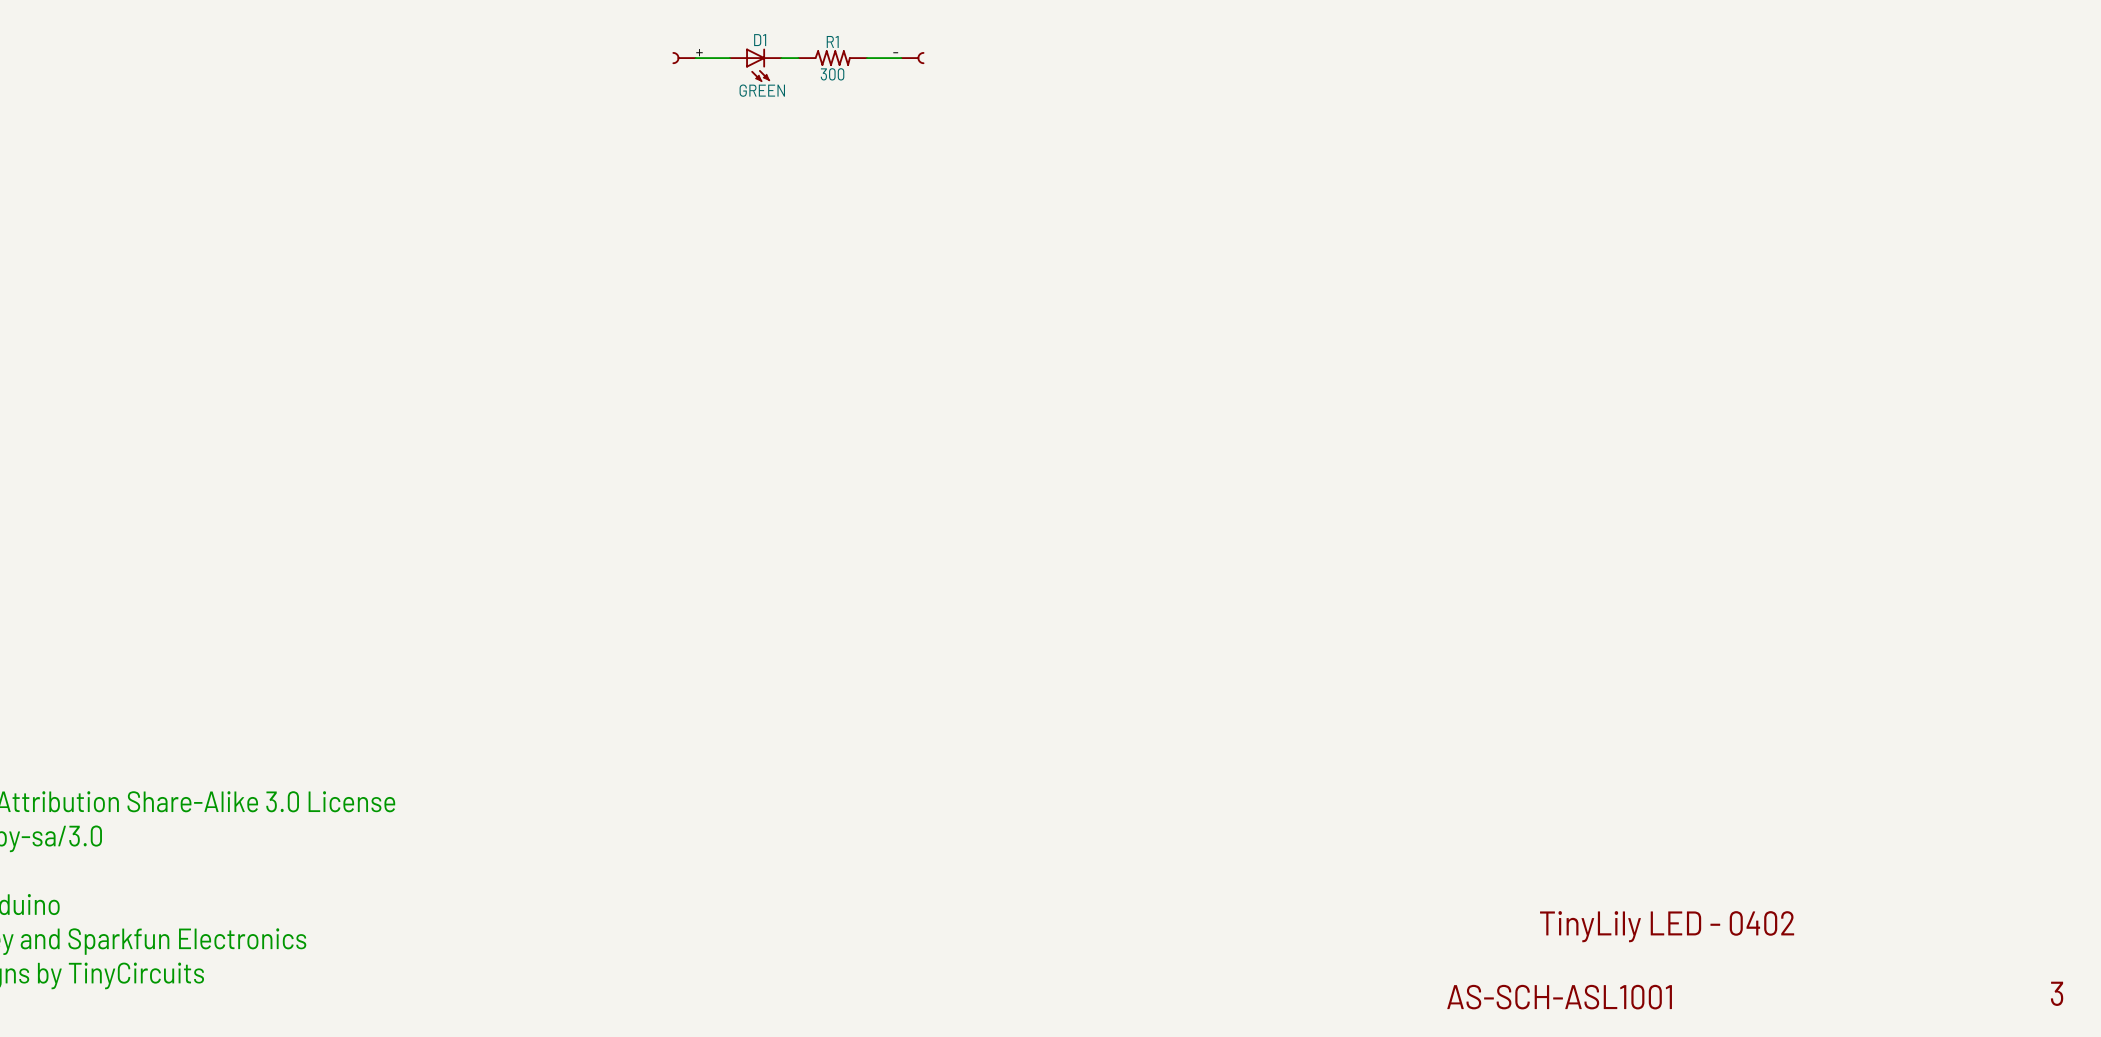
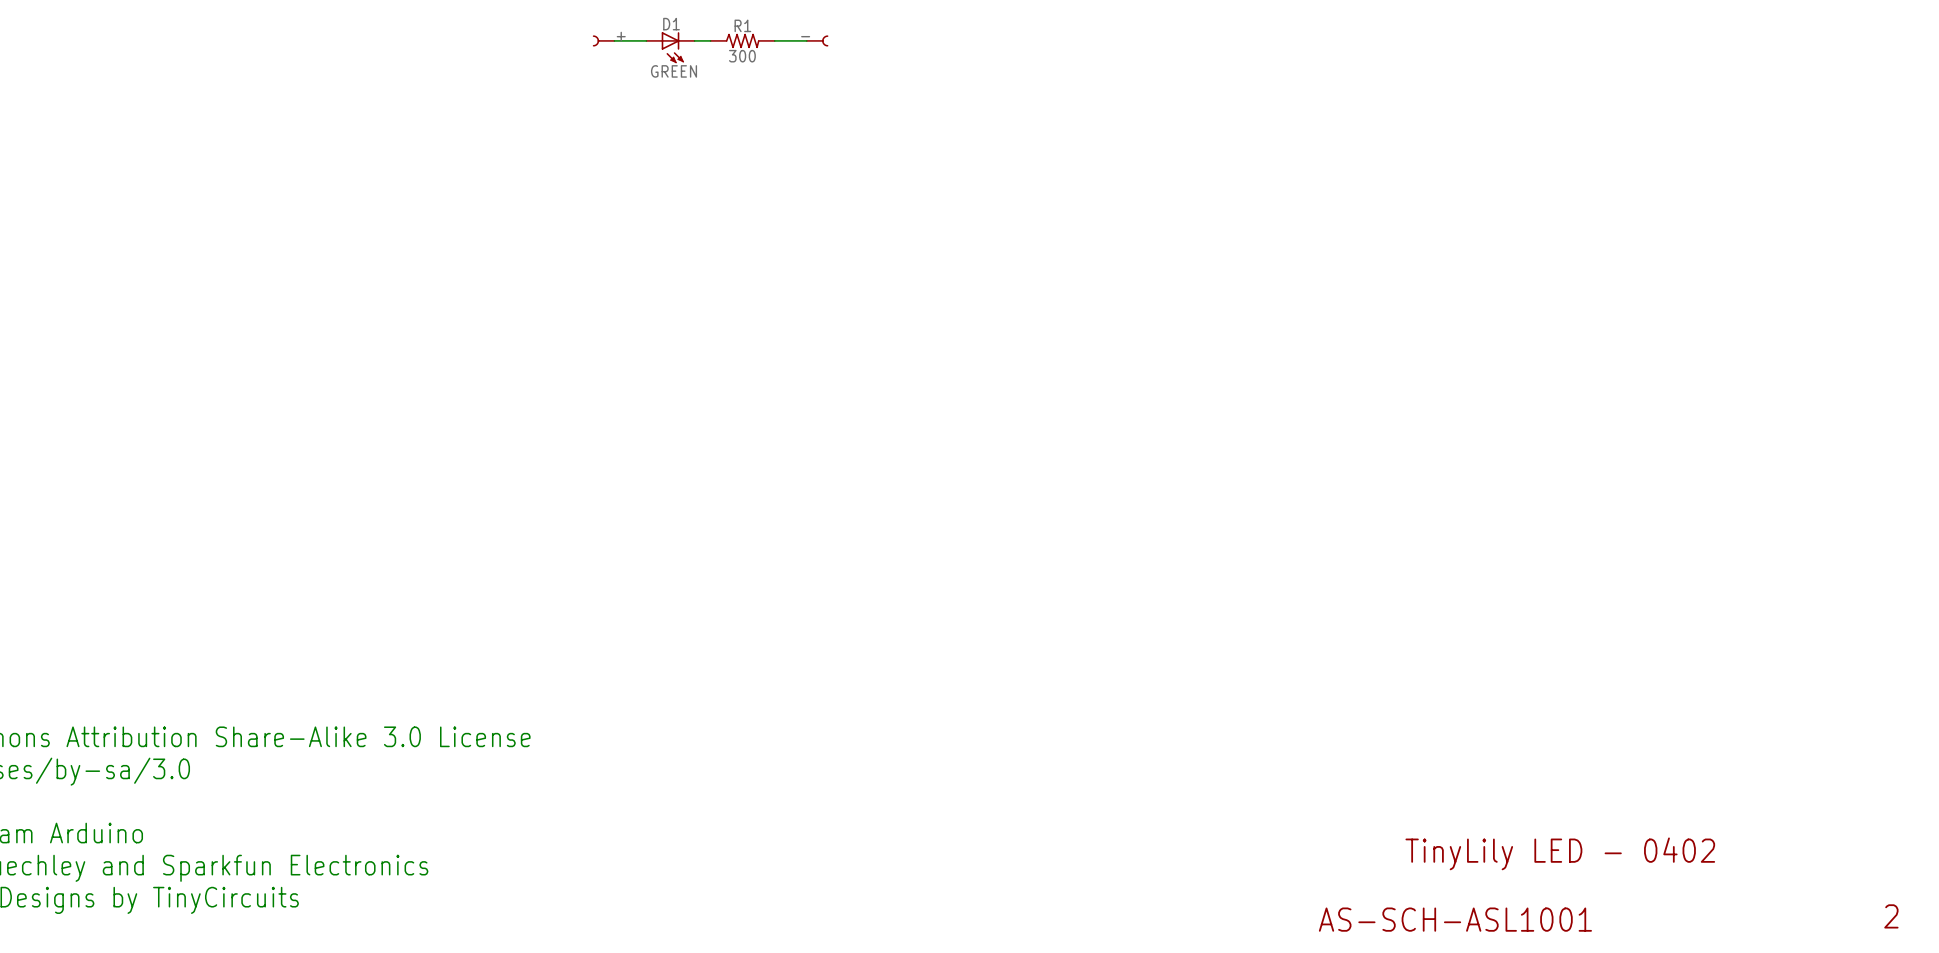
text: 3 (2057, 993) -> 2 (1891, 916)

